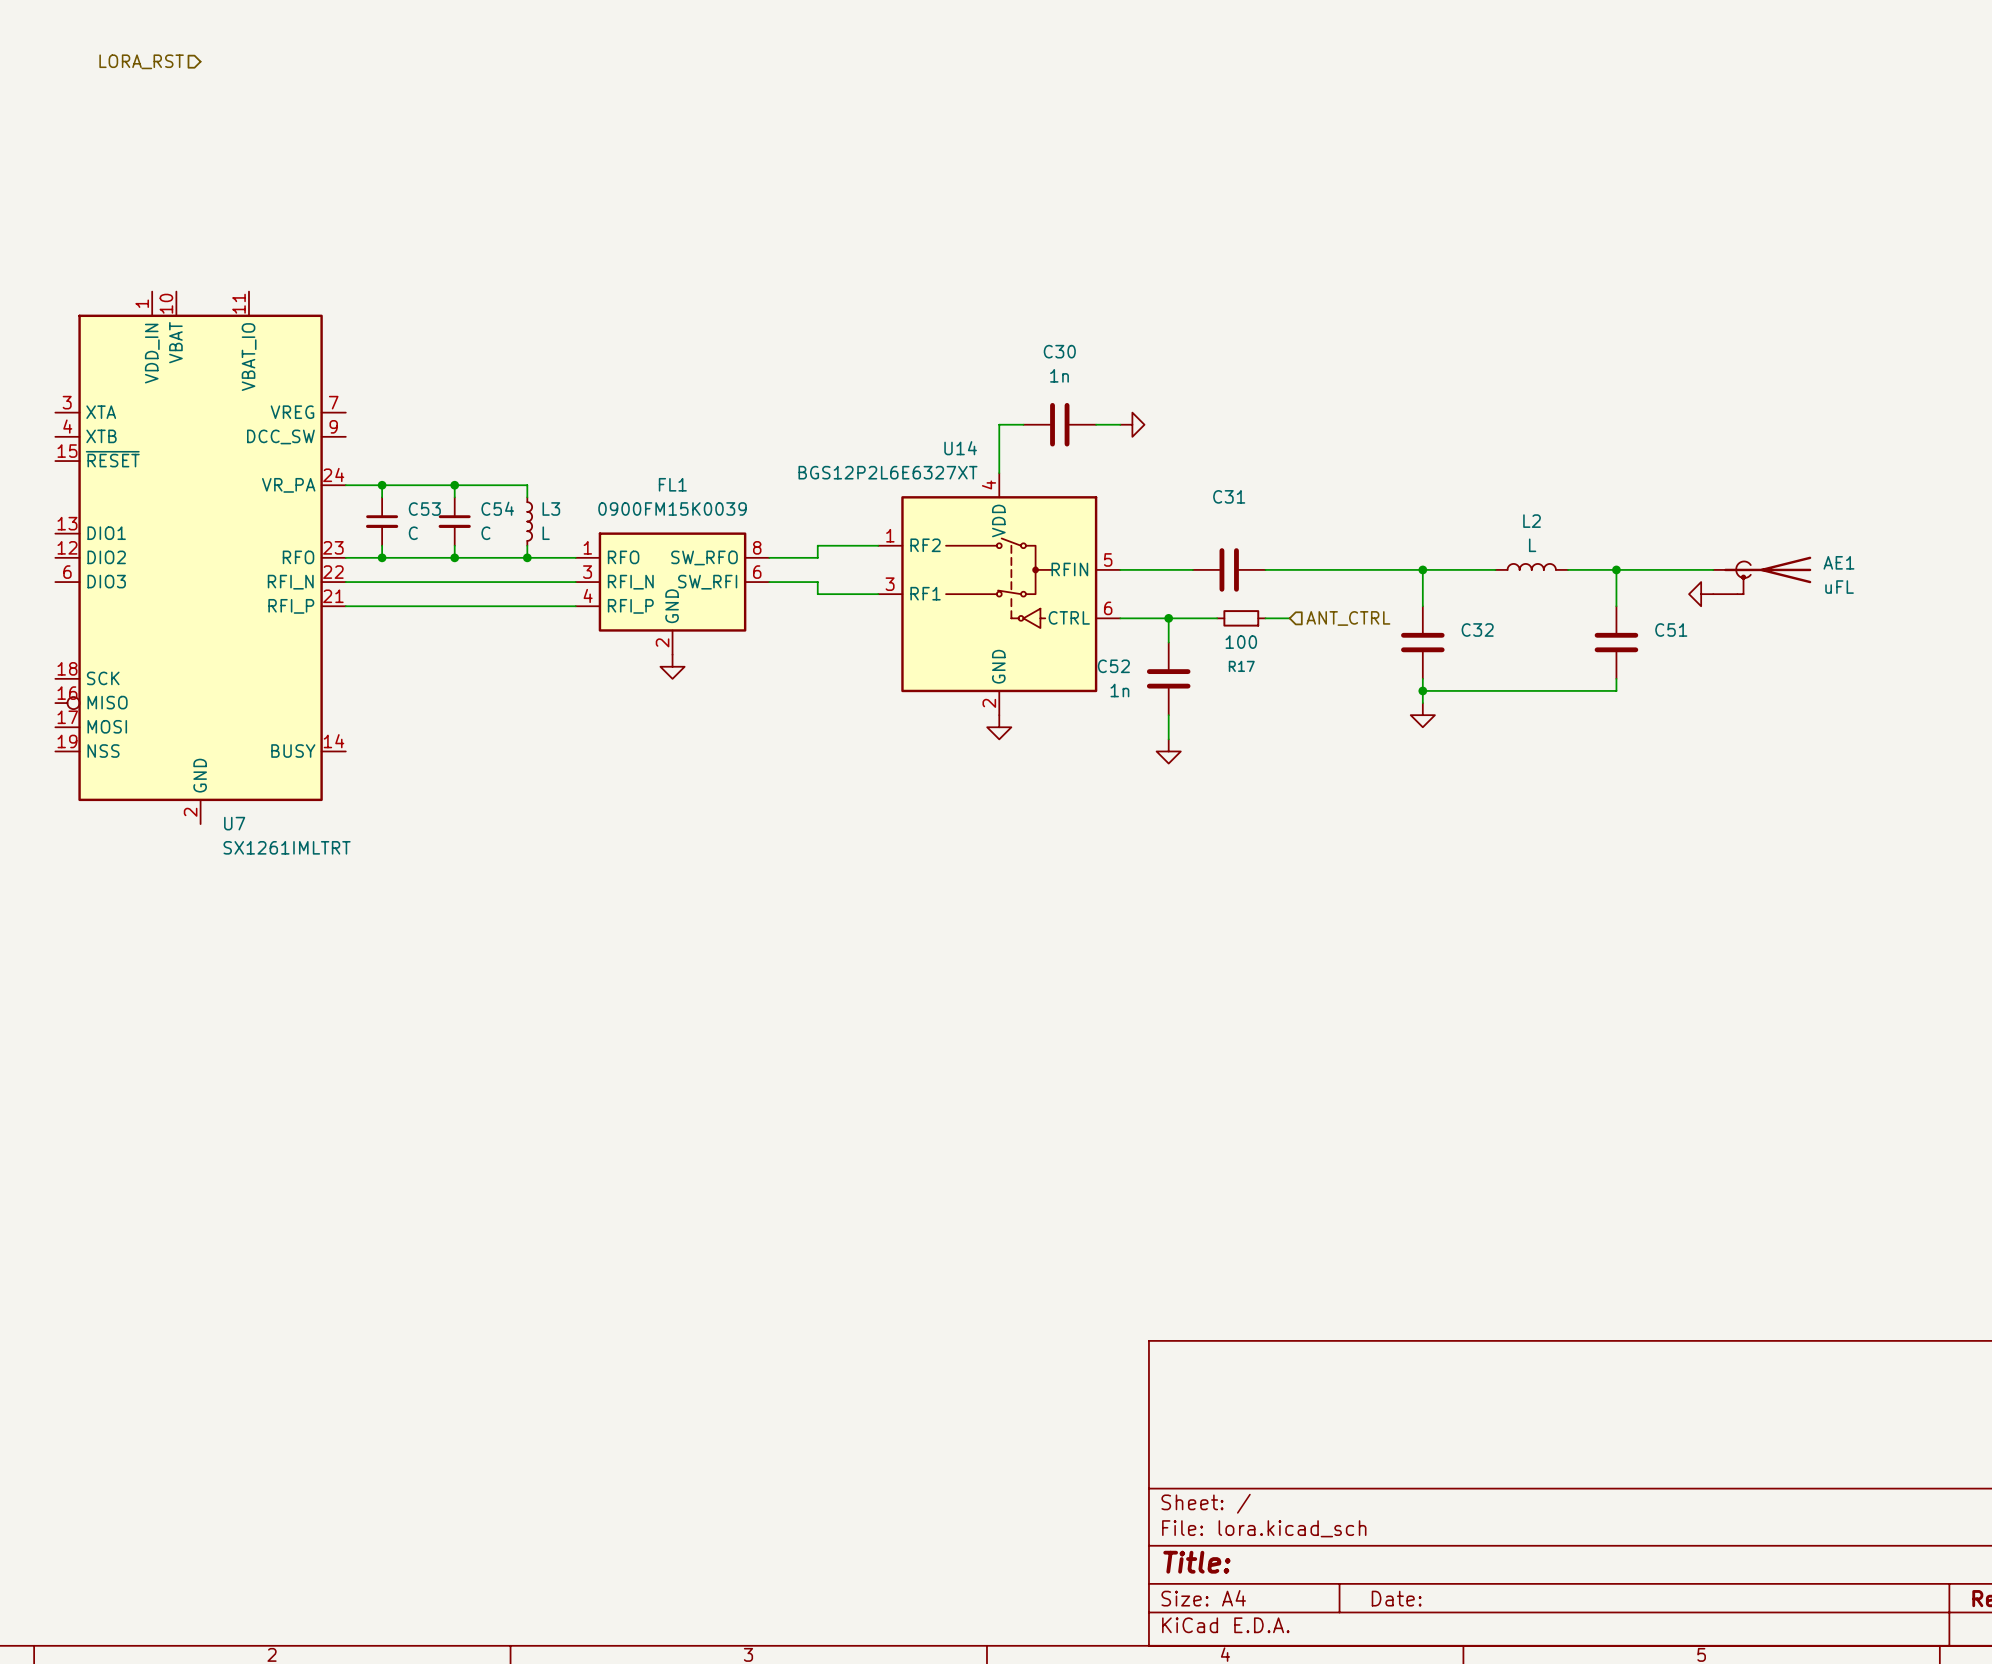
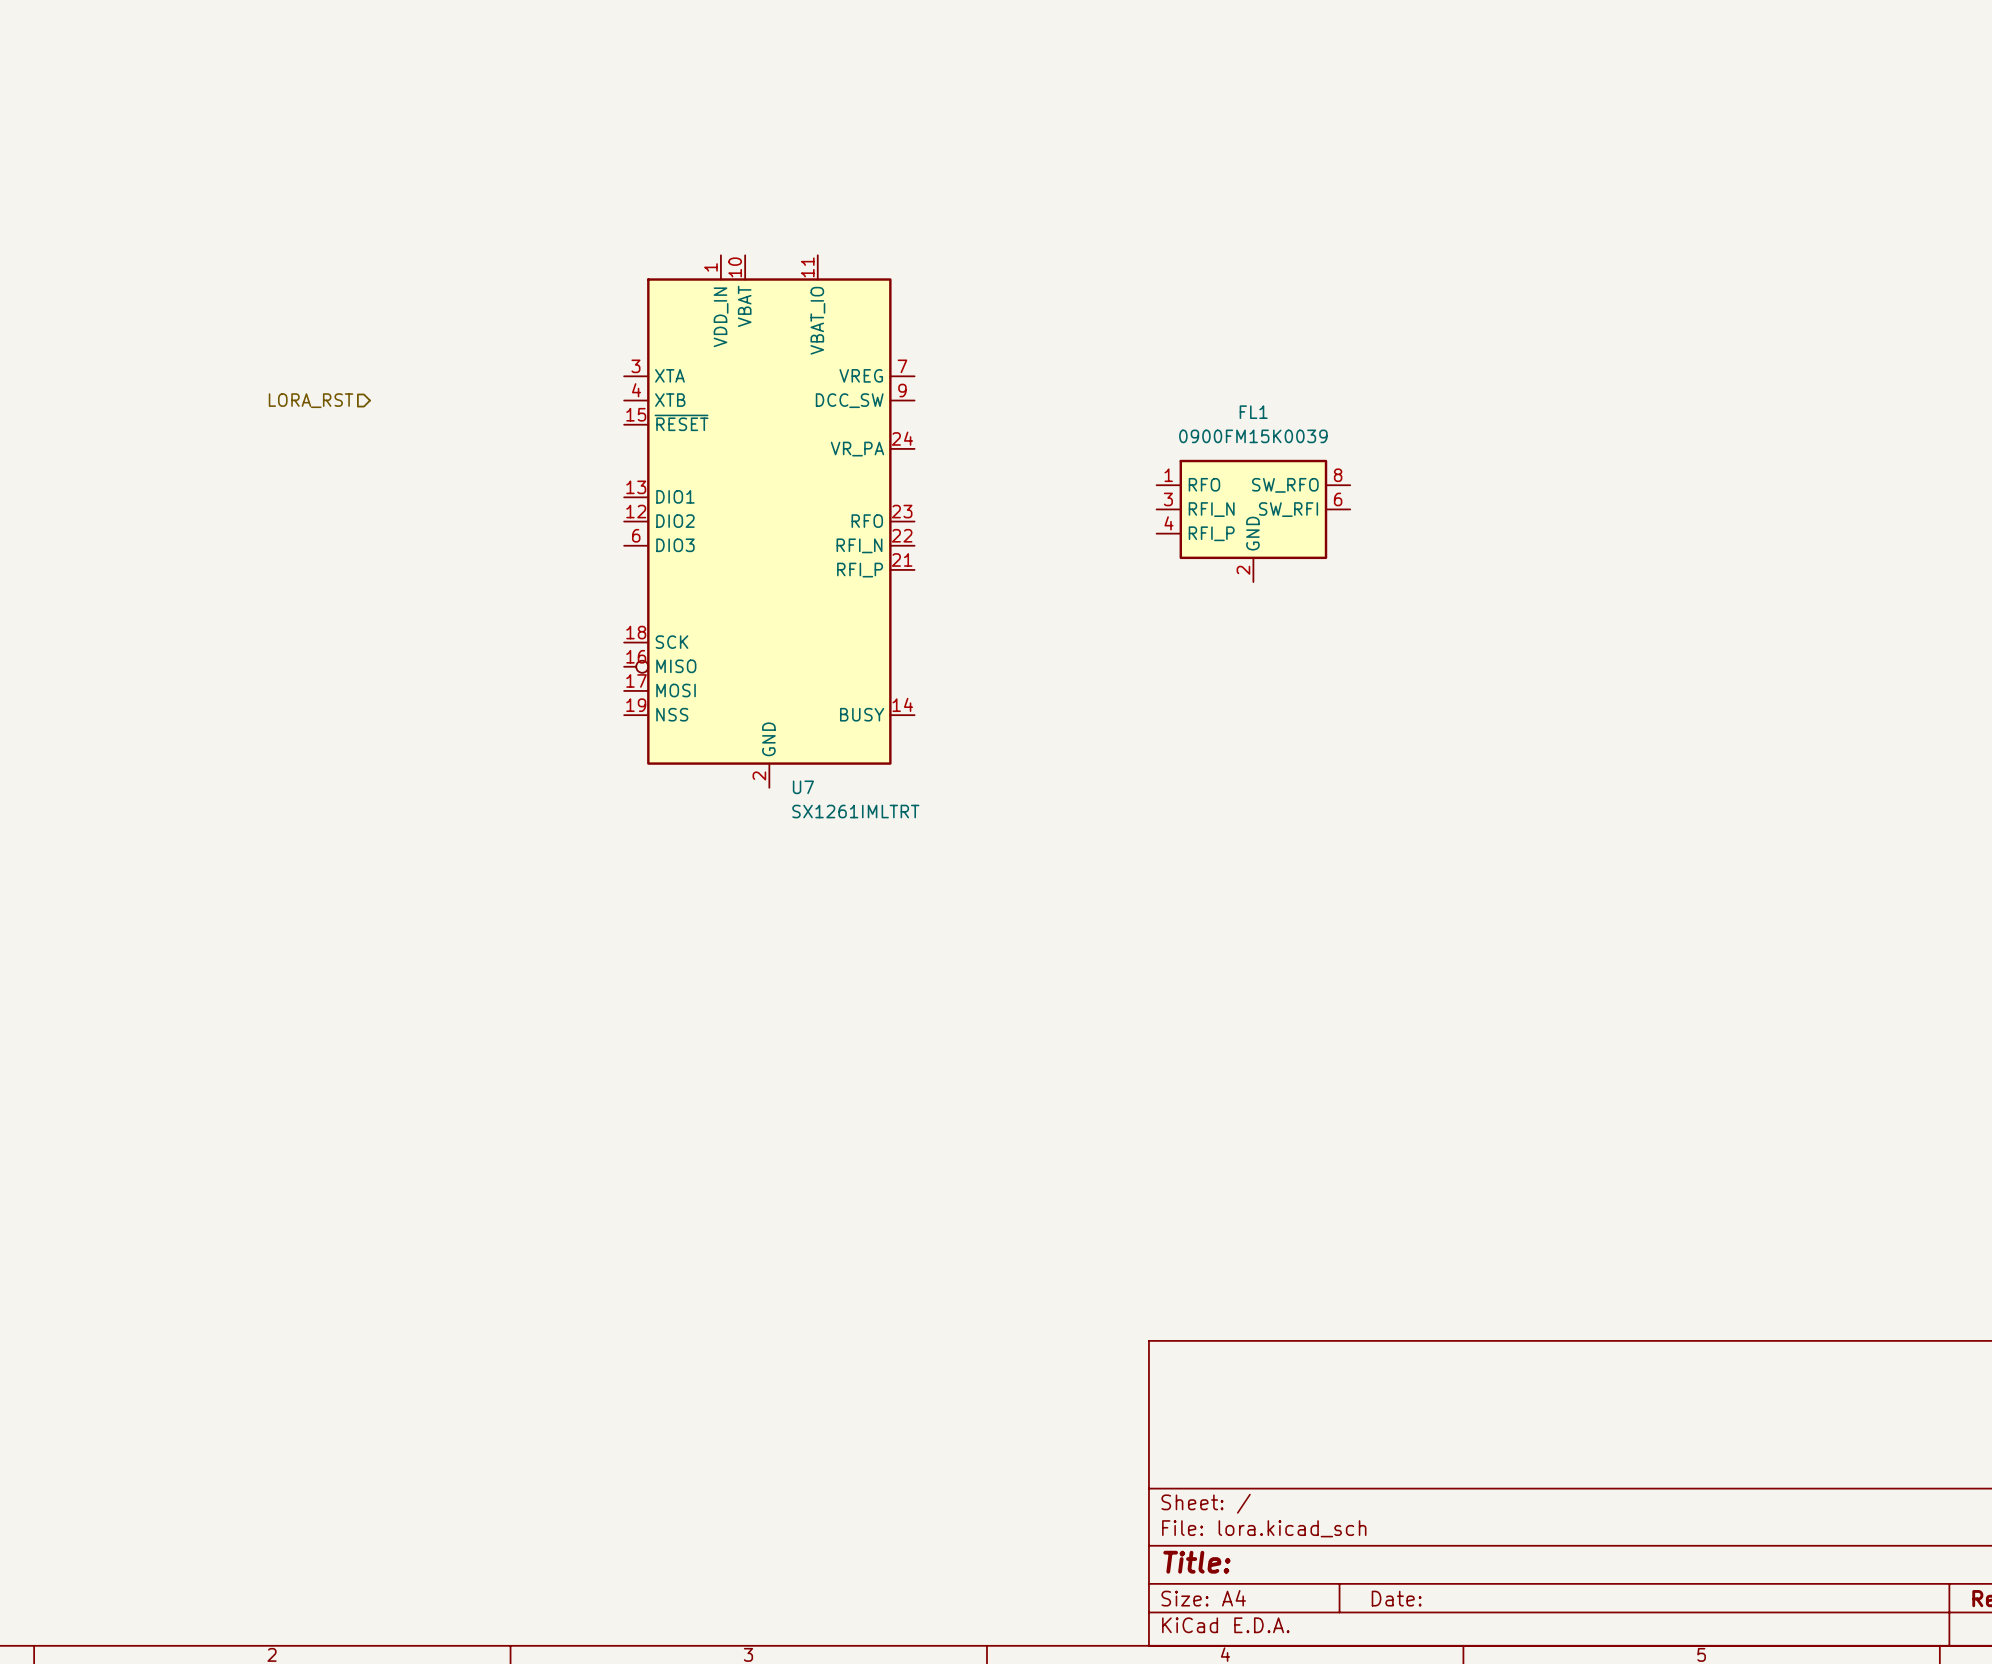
hierarchical label: LORA_RST (141, 61) -> none
hierarchical label: none -> LORA_RST (311, 400)
wire: (1023, 424) (999, 424) (999, 473) -> none
C30: 1n (1059, 424) -> none
wire: (1096, 424) (1120, 424) -> none
power symbol: (1132, 424) -> none
wire: (345, 485) (527, 485) (527, 497) -> none
wire: (382, 485) (382, 497) -> none
junction: (382, 485) -> none
wire: (454, 485) (454, 497) -> none
junction: (454, 485) -> none
C53: C (382, 521) -> none
C54: C (454, 521) -> none
L3: L (529, 521) -> none
wire: (382, 545) (382, 557) -> none
wire: (454, 545) (454, 557) -> none
wire: (527, 545) (527, 557) -> none
U7 position: (200, 557) -> (769, 521)
wire: (345, 557) (575, 557) -> none
junction: (382, 557) -> none
junction: (454, 557) -> none
junction: (527, 557) -> none
L2: L (1531, 566) -> none
wire: (1120, 569) (1192, 569) -> none
C31: (1229, 569) -> none
wire: (1265, 569) (1495, 569) -> none
wire: (1422, 569) (1422, 606) -> none
junction: (1422, 569) -> none
wire: (1568, 569) (1713, 569) -> none
wire: (1616, 569) (1616, 606) -> none
junction: (1616, 569) -> none
AE1: uFL (1762, 575) -> none
wire: (345, 582) (575, 582) -> none
FL1 position: (672, 593) -> (1253, 520)
U14: BGS12P2L6E6327XT (999, 594) -> none
power symbol: (1701, 594) -> none
wire: (345, 606) (575, 606) -> none
wire: (1120, 618) (1217, 618) -> none
wire: (1168, 618) (1168, 642) -> none
junction: (1168, 618) -> none
R17: 100 (1241, 618) -> none
wire: (1265, 618) (1289, 618) -> none
hierarchical label: ANT_CTRL (1348, 618) -> none
C32: (1422, 642) -> none
C51: (1616, 642) -> none
power symbol: (672, 666) -> none
C52: 1n (1168, 678) -> none
wire: (1422, 678) (1422, 703) -> none
wire: (1616, 678) (1616, 690) (1422, 690) -> none
junction: (1422, 690) -> none
wire: (1168, 715) (1168, 739) -> none
power symbol: (1422, 715) -> none
power symbol: (999, 727) -> none
power symbol: (1168, 751) -> none

